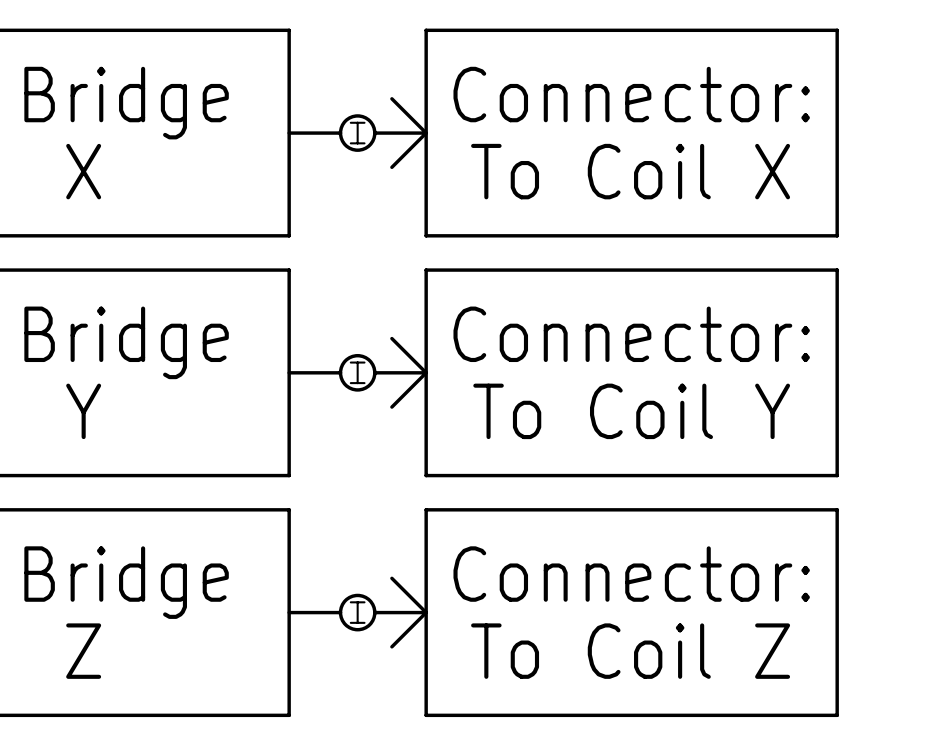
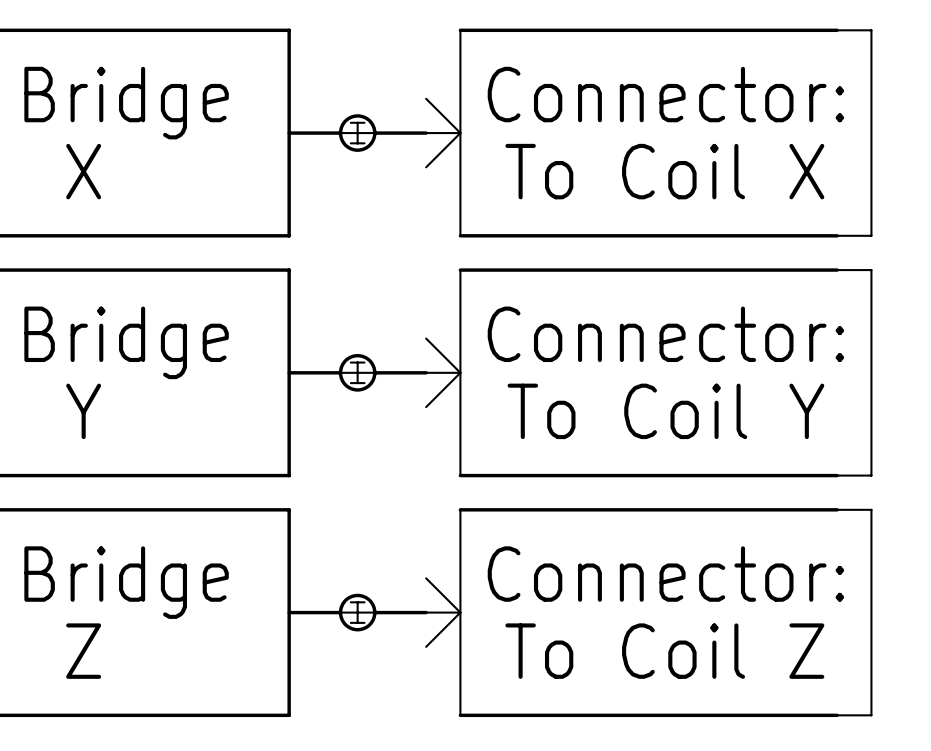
line: (460, 30) (426, 30) (426, 235) (460, 235) -> (460, 30) (460, 235)
line: (837, 30) (837, 235) -> (837, 30) (871, 30) (871, 235) (837, 235)
text position: Connector: (631, 94) -> Connector: (665, 94)
line: (391, 98) (426, 133) (391, 167) -> none
line: none -> (426, 98) (460, 133)
line: none -> (340, 133) (374, 133)
line: none -> (426, 133) (460, 133)
line: none -> (460, 133) (426, 167)
text position: To Coil X (630, 171) -> To Coil X (664, 171)
line: (460, 270) (426, 270) (426, 475) (460, 475) -> (460, 270) (460, 475)
line: (837, 270) (837, 475) -> (837, 270) (871, 270) (871, 475) (837, 475)
text position: Connector: (631, 334) -> Connector: (665, 334)
line: (391, 338) (426, 372) (391, 407) -> none
line: none -> (426, 338) (460, 372)
line: none -> (340, 372) (374, 372)
line: none -> (426, 372) (460, 372)
line: none -> (460, 372) (426, 407)
text position: To Coil Y (631, 411) -> To Coil Y (665, 411)
line: (460, 509) (426, 509) (426, 715) (460, 715) -> (460, 509) (460, 715)
line: (837, 509) (837, 715) -> (837, 509) (871, 509) (871, 715) (837, 715)
text position: Connector: (631, 574) -> Connector: (665, 574)
line: (391, 578) (426, 612) (391, 646) -> none
line: none -> (426, 578) (460, 612)
line: none -> (340, 612) (374, 612)
line: none -> (426, 612) (460, 612)
line: none -> (460, 612) (426, 646)
text position: To Coil Z (630, 651) -> To Coil Z (664, 651)

